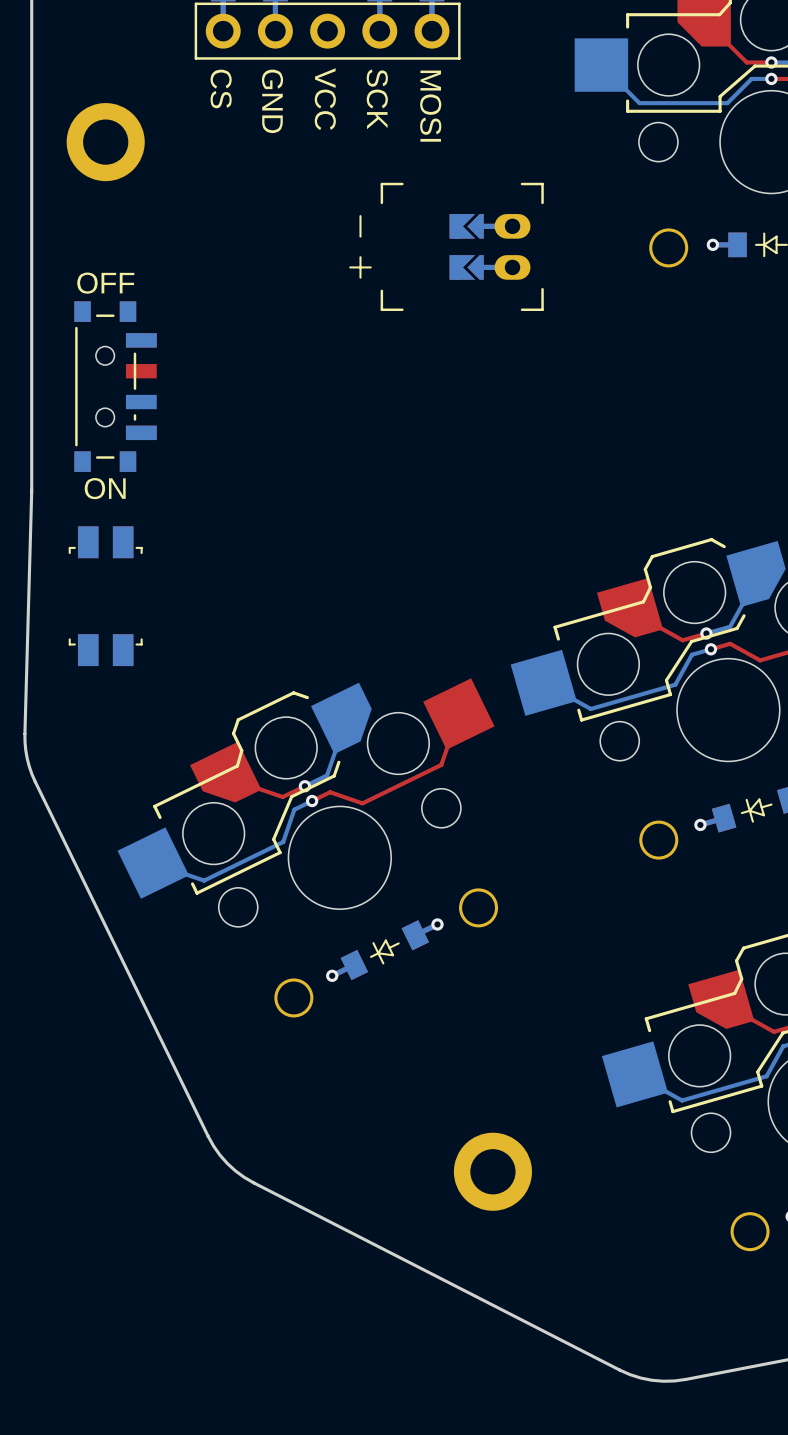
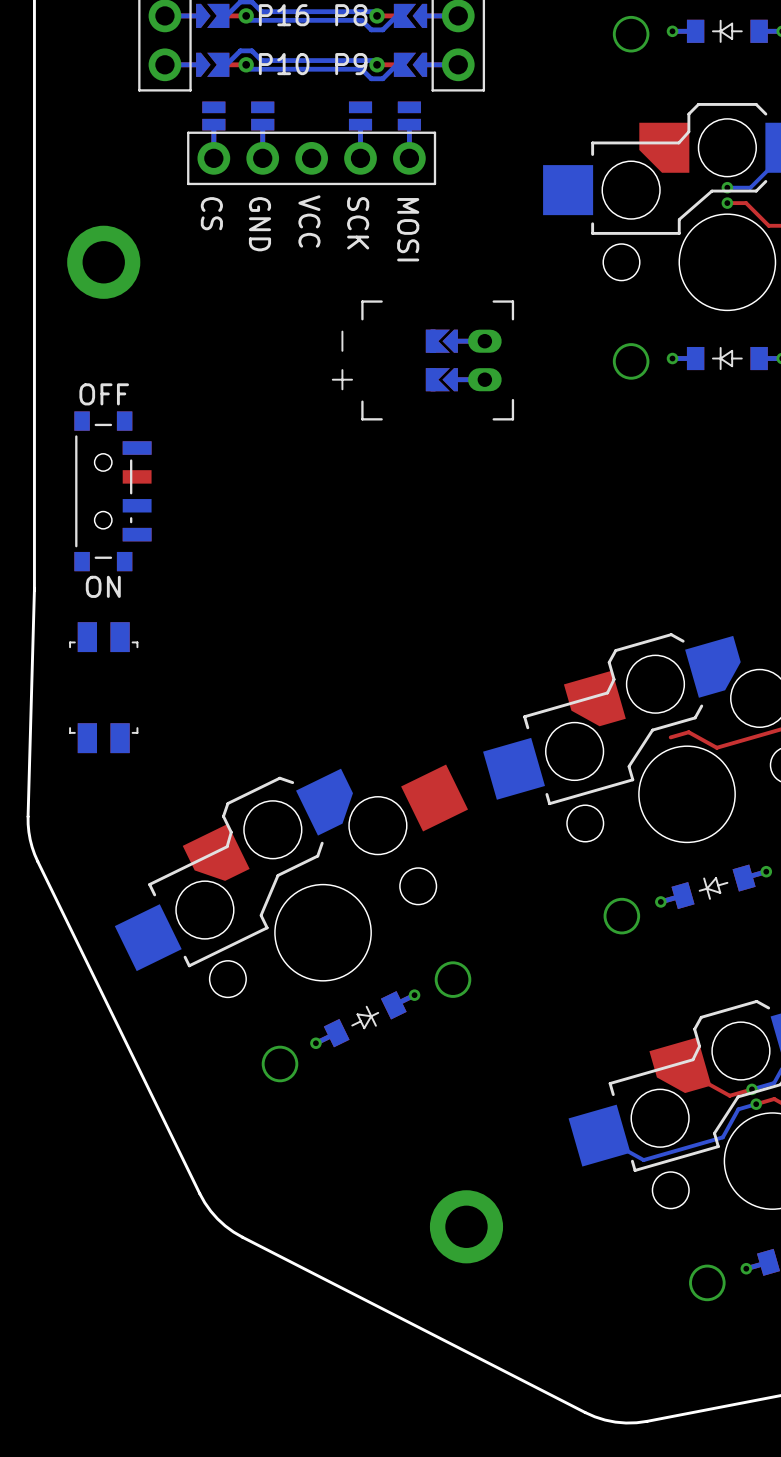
top track: (704, 19) (746, 62) (771, 62) -> none
bottom track: (601, 65) (639, 103) (727, 103) (751, 78) (771, 78) -> none
bottom track: (759, 573) (730, 626) (706, 633) -> none
top track: (629, 611) (682, 640) (706, 633) -> none
via: (706, 633) -> none
bottom track: (710, 649) (691, 654) (675, 684) (590, 708) (543, 682) -> none
via: (710, 649) -> none
top track: (458, 714) (441, 764) (362, 803) (330, 792) (312, 801) -> none
bottom track: (346, 718) (327, 775) (304, 786) -> none
top track: (225, 777) (282, 797) (304, 786) -> none
via: (304, 786) -> none
bottom track: (312, 801) (294, 809) (283, 842) (204, 880) (153, 863) -> none
via: (312, 801) -> none
part rotation: 0° (384, 950) -> 180° (365, 1019)

